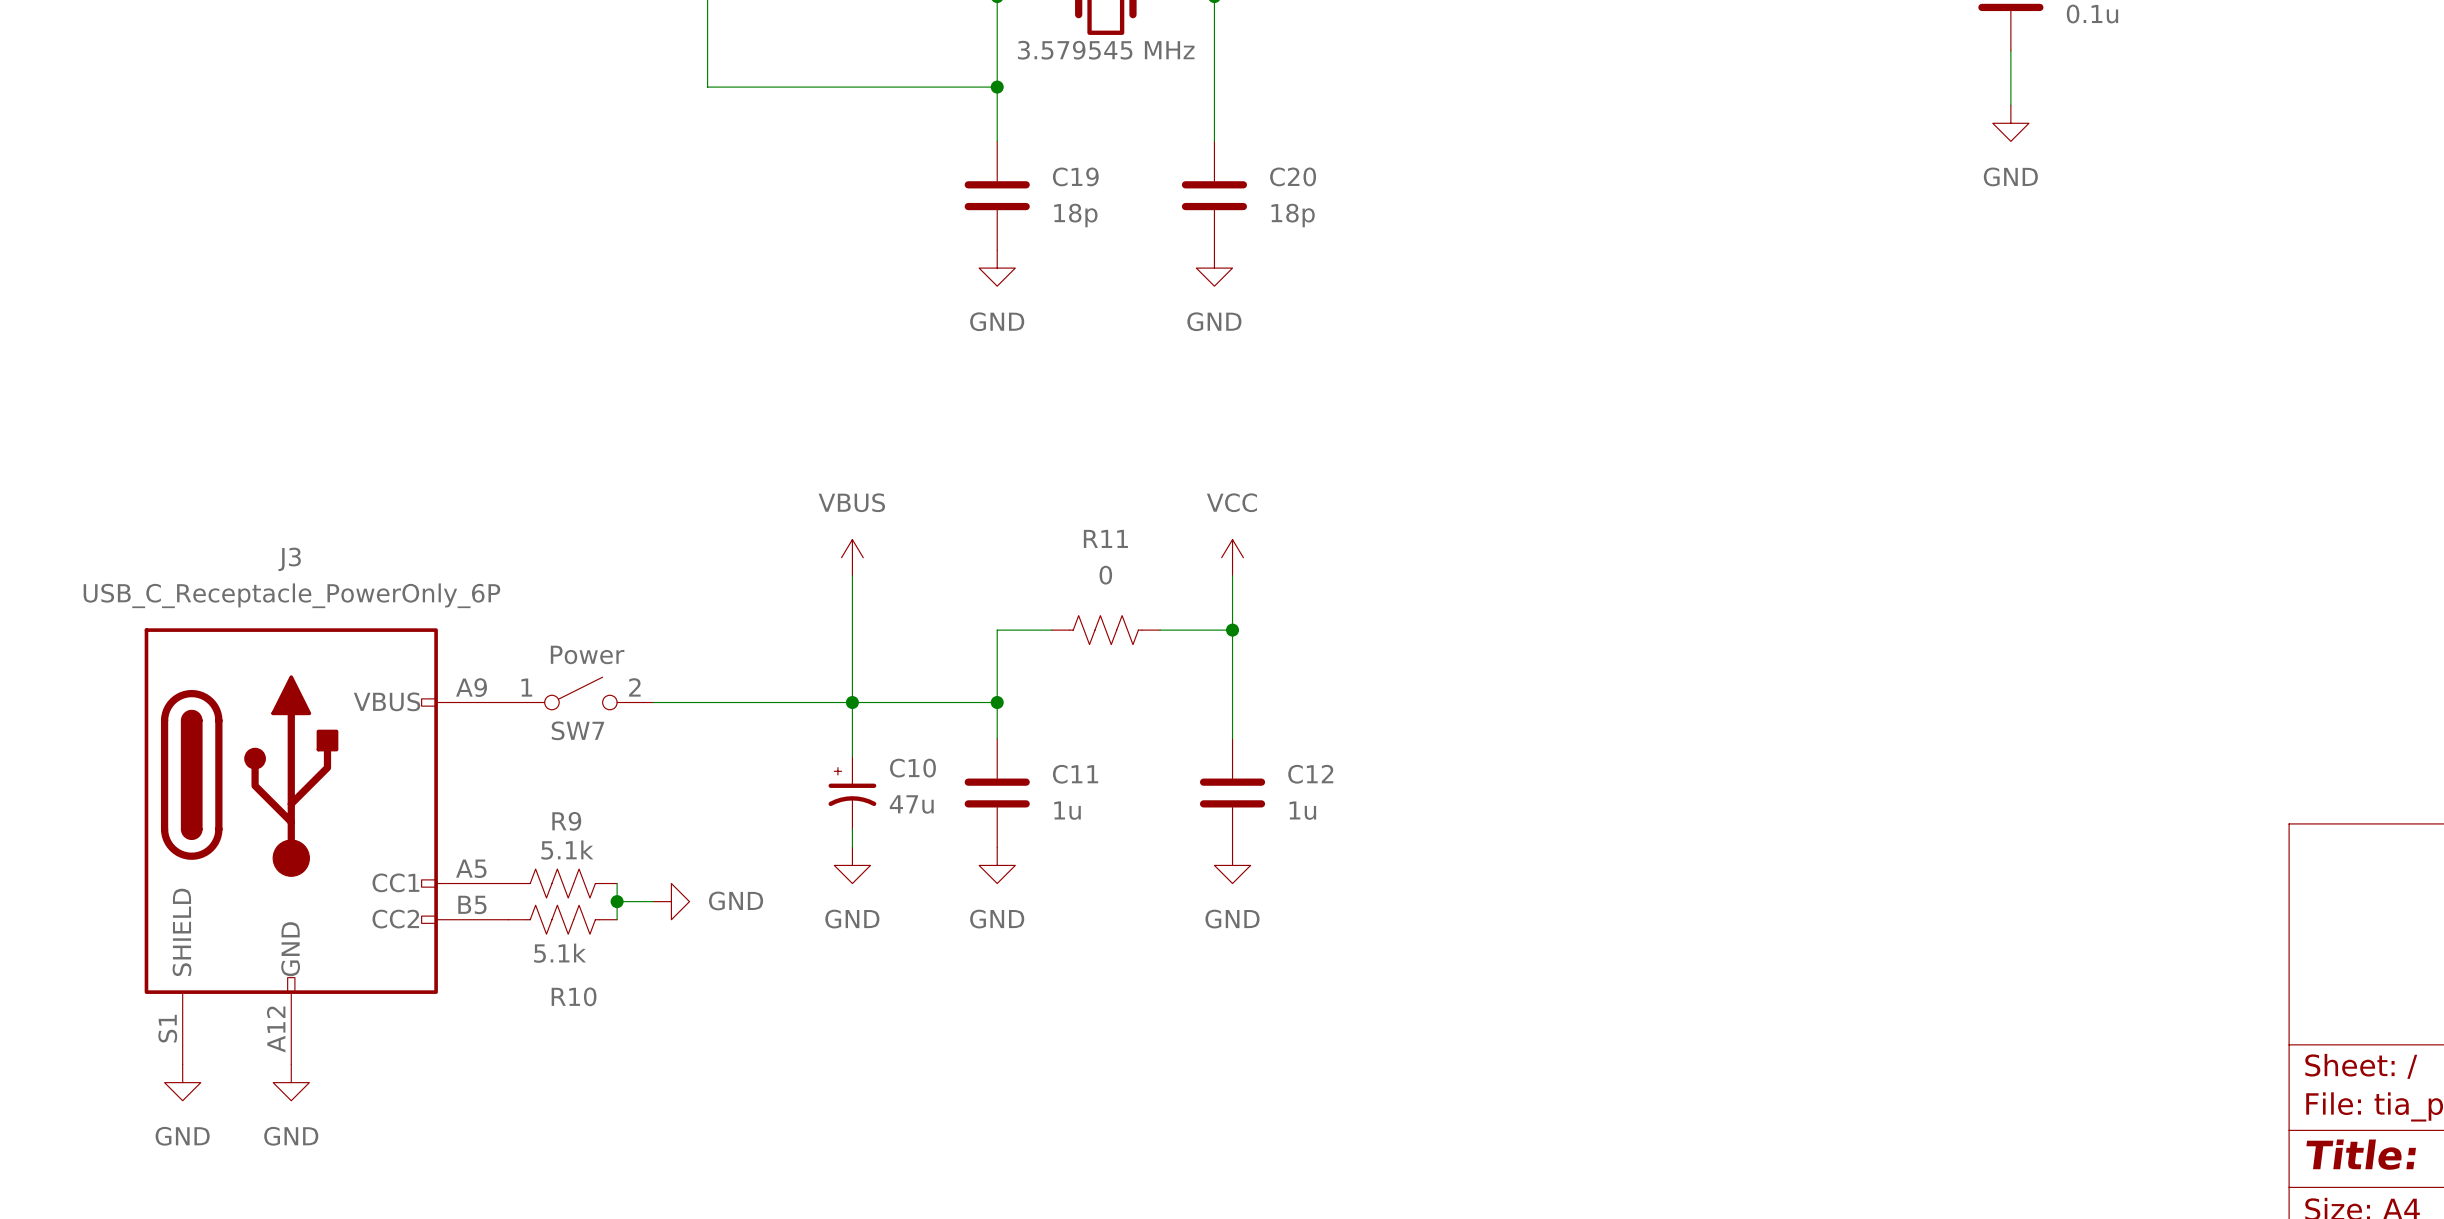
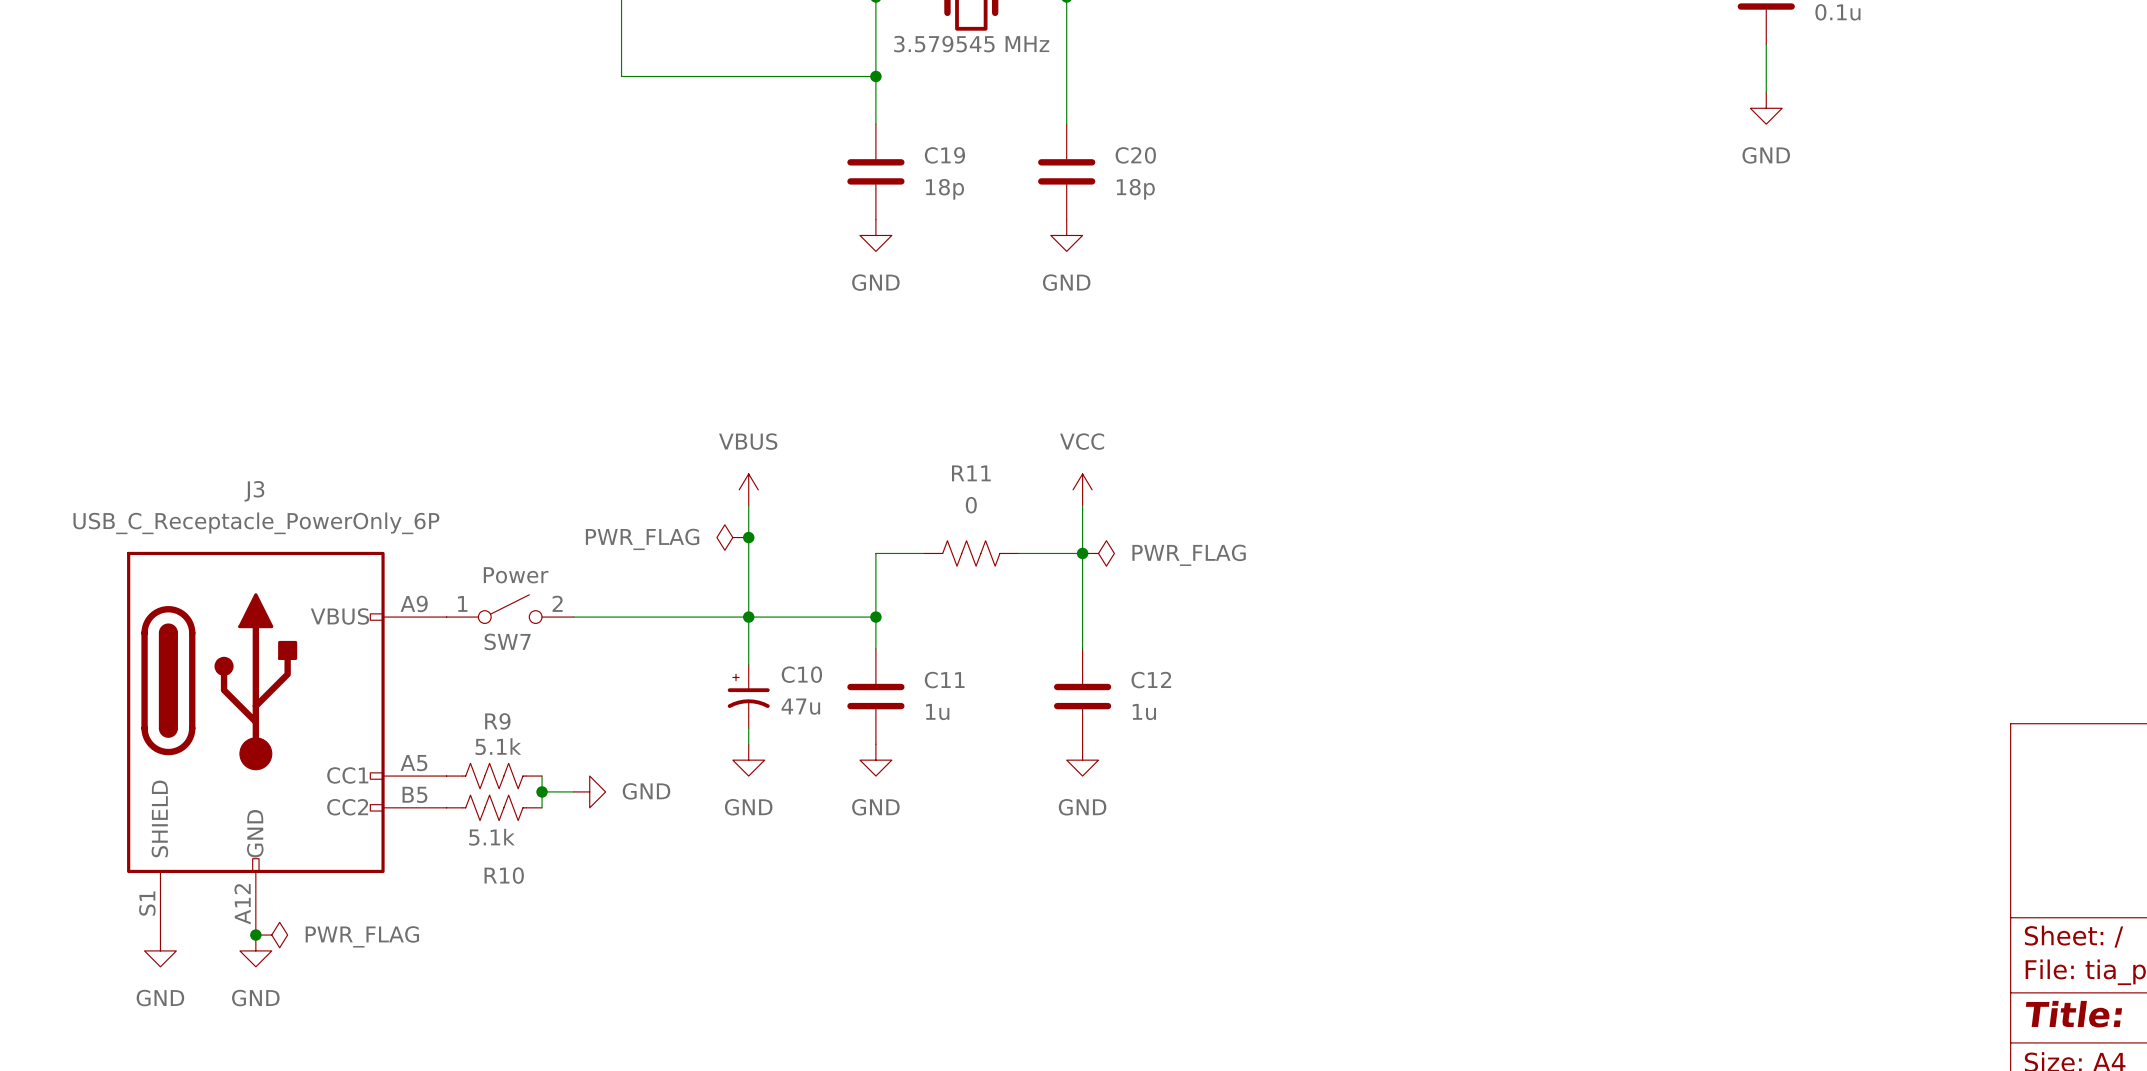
power symbol: none -> PWR_FLAG (732, 537)
junction: none -> (748, 537)
power symbol: none -> PWR_FLAG (1098, 553)
junction: none -> (255, 935)
power symbol: none -> PWR_FLAG (271, 935)

